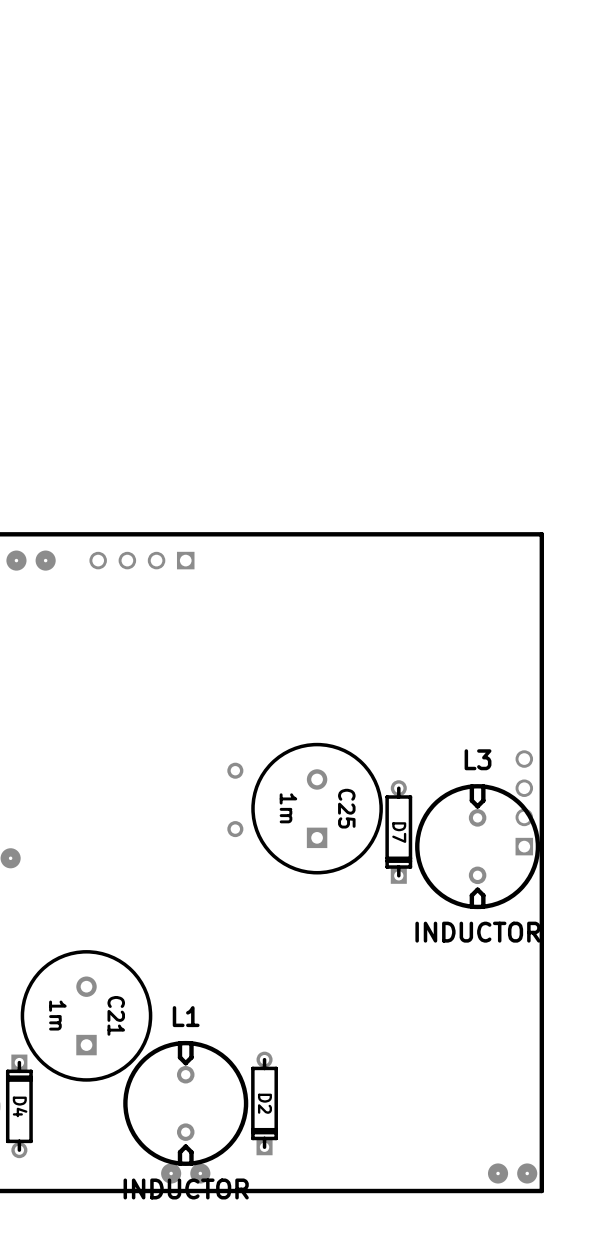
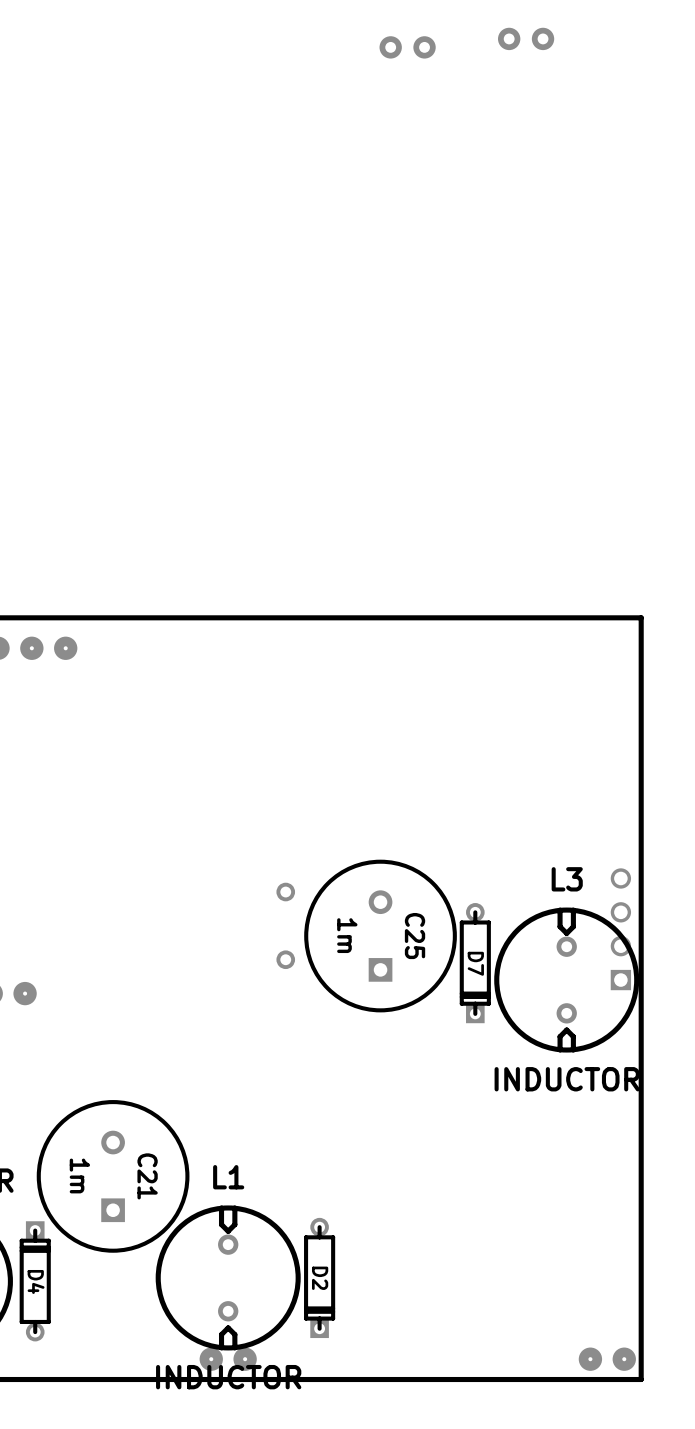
part: none -> (526, 38)
part: none -> (407, 47)
part: (141, 560) -> none

